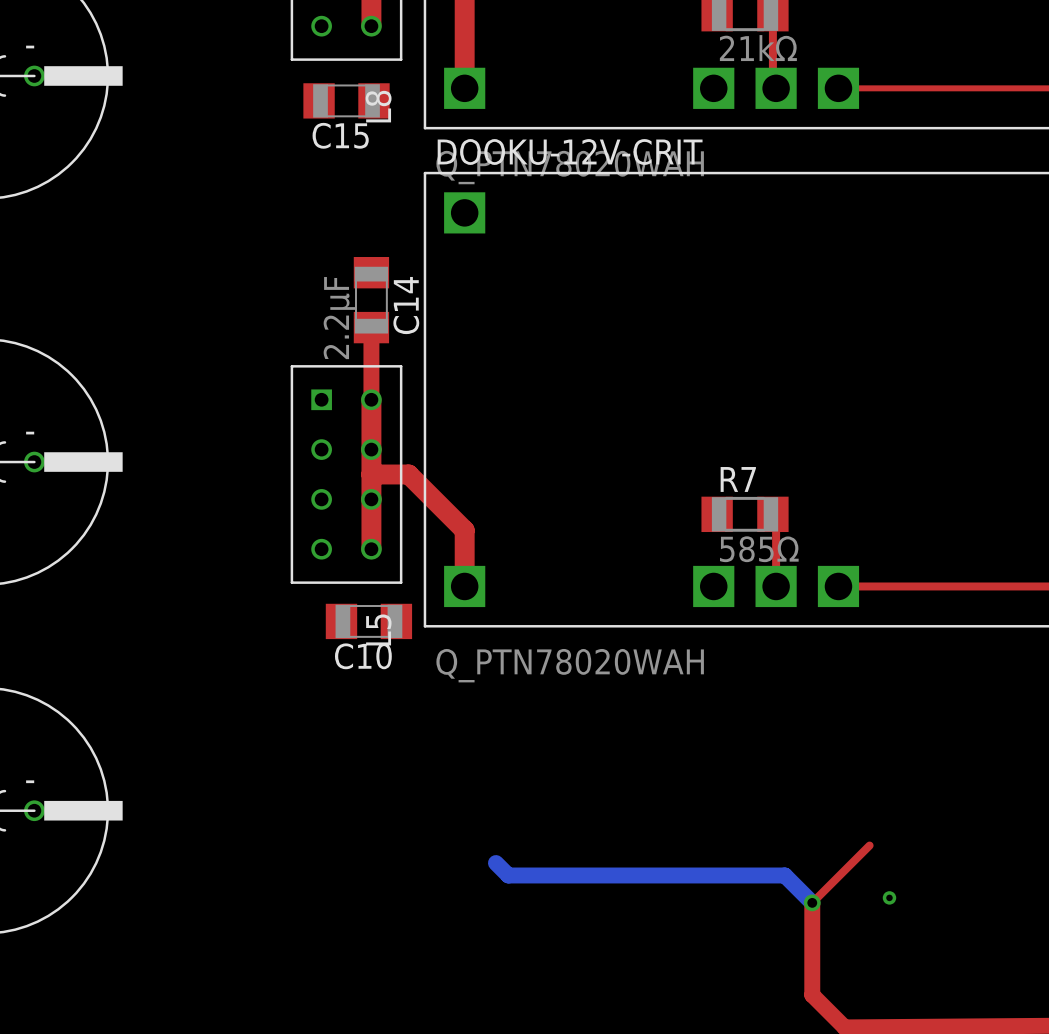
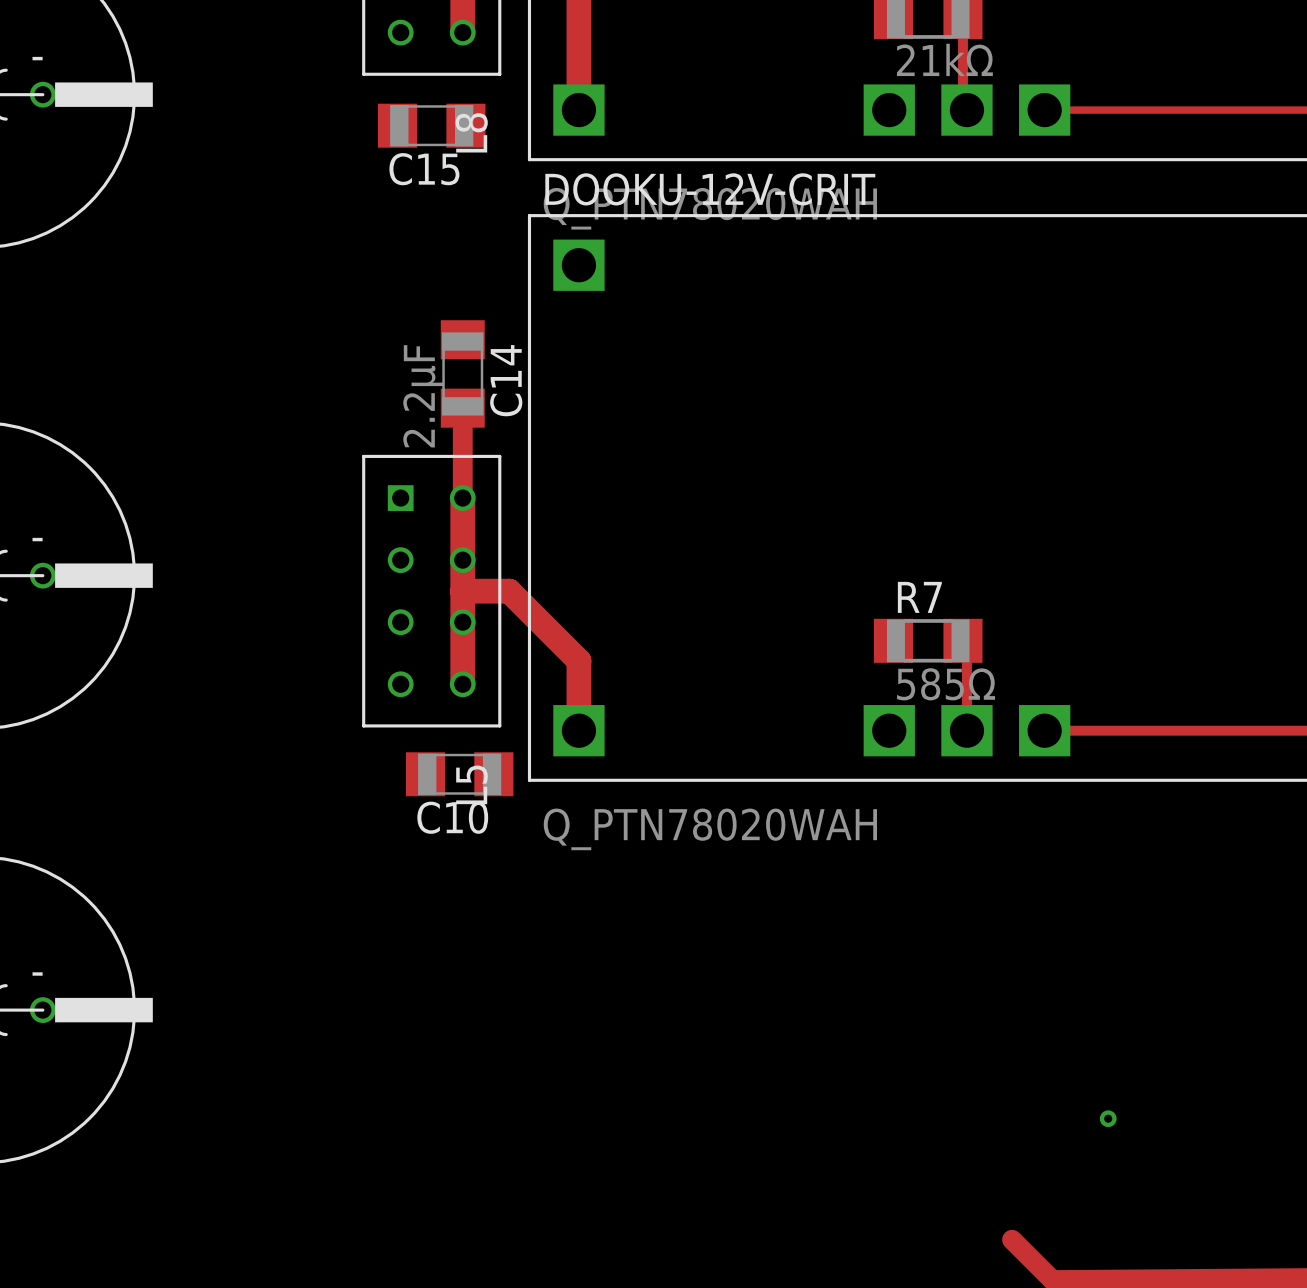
top track: (869, 845) (812, 902) (812, 995) -> none
bottom track: (495, 863) (508, 875) (784, 875) (812, 902) -> none
via: (812, 902) -> none

